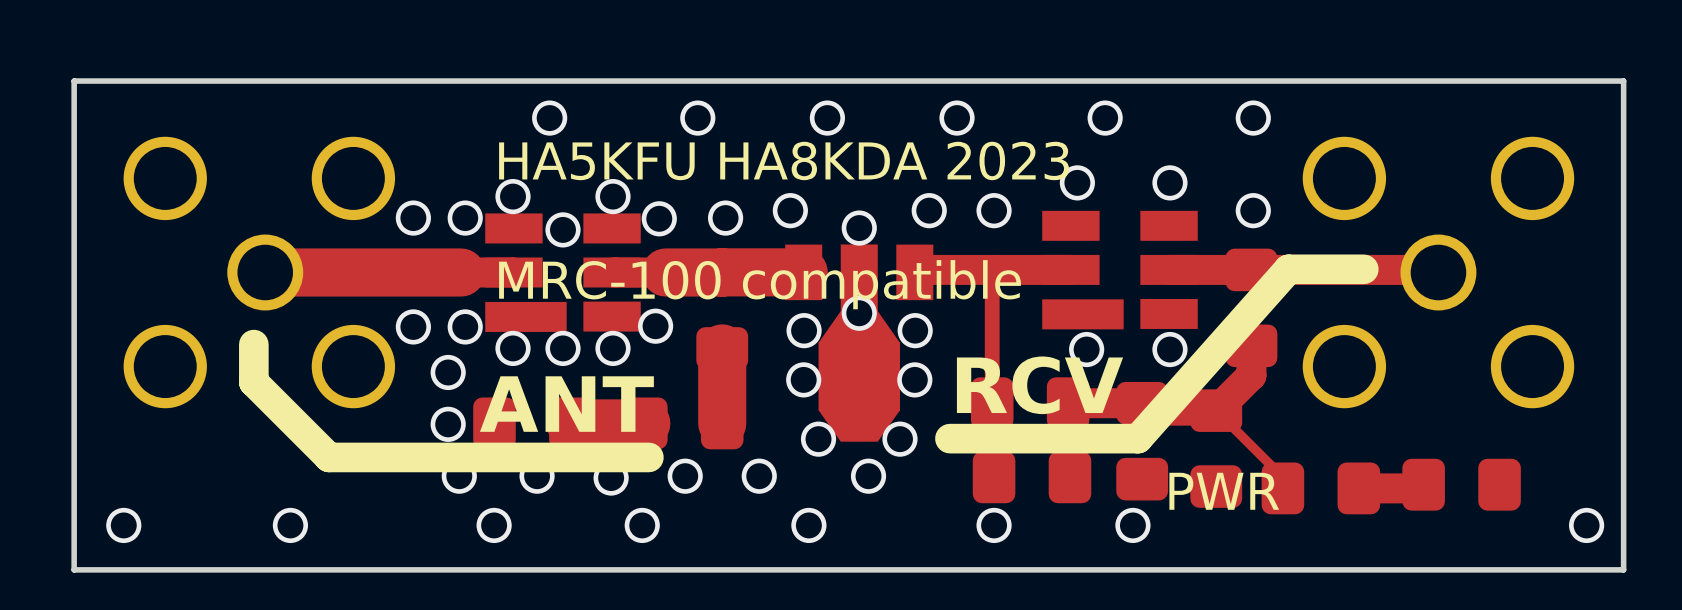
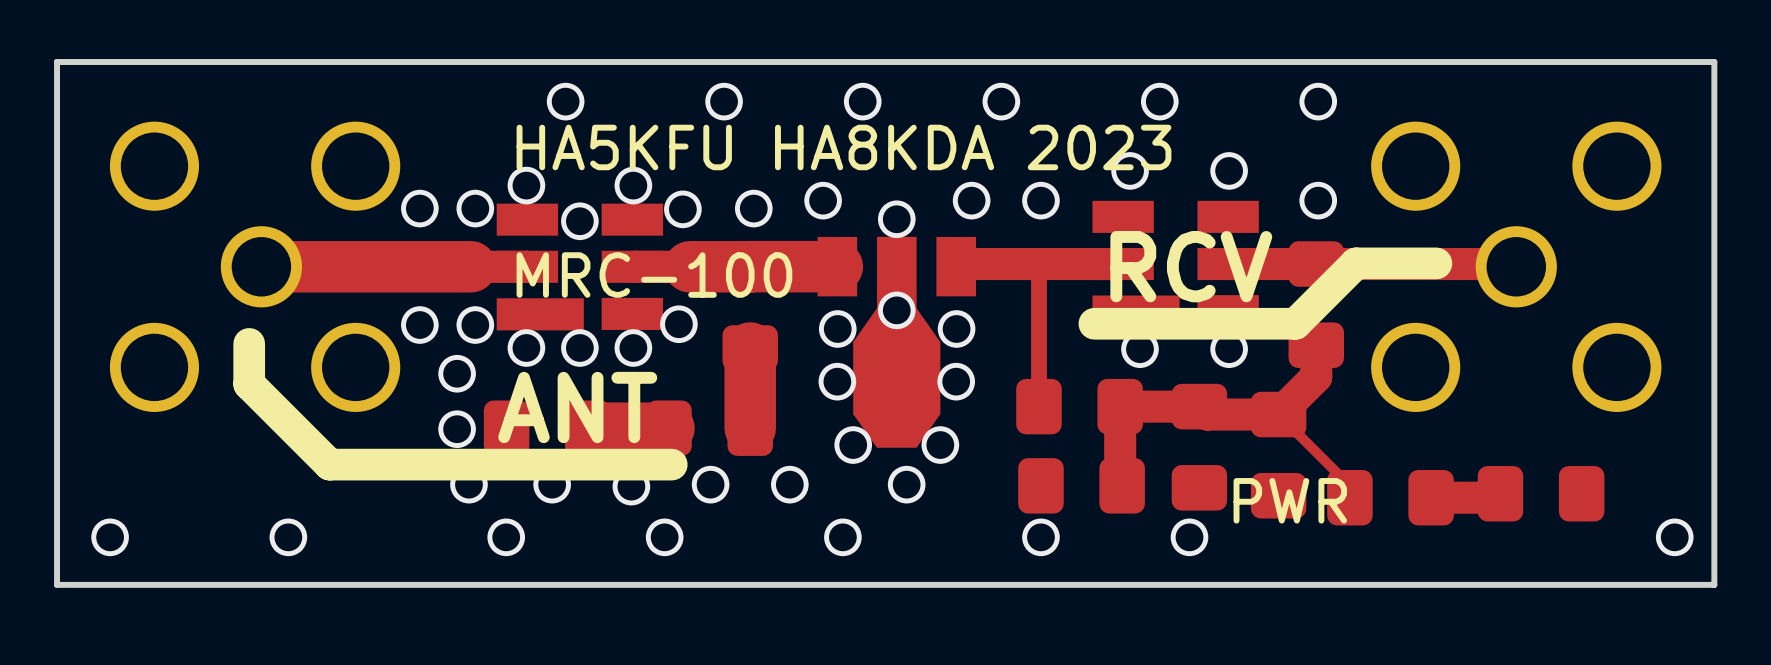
line: (1288, 269) (1138, 438) (949, 438) -> (1355, 263) (1295, 323) (1094, 323)
text: MRC-100 compatible (760, 284) -> MRC-100 (654, 275)
text position: RCV (1040, 385) -> RCV (1191, 266)

